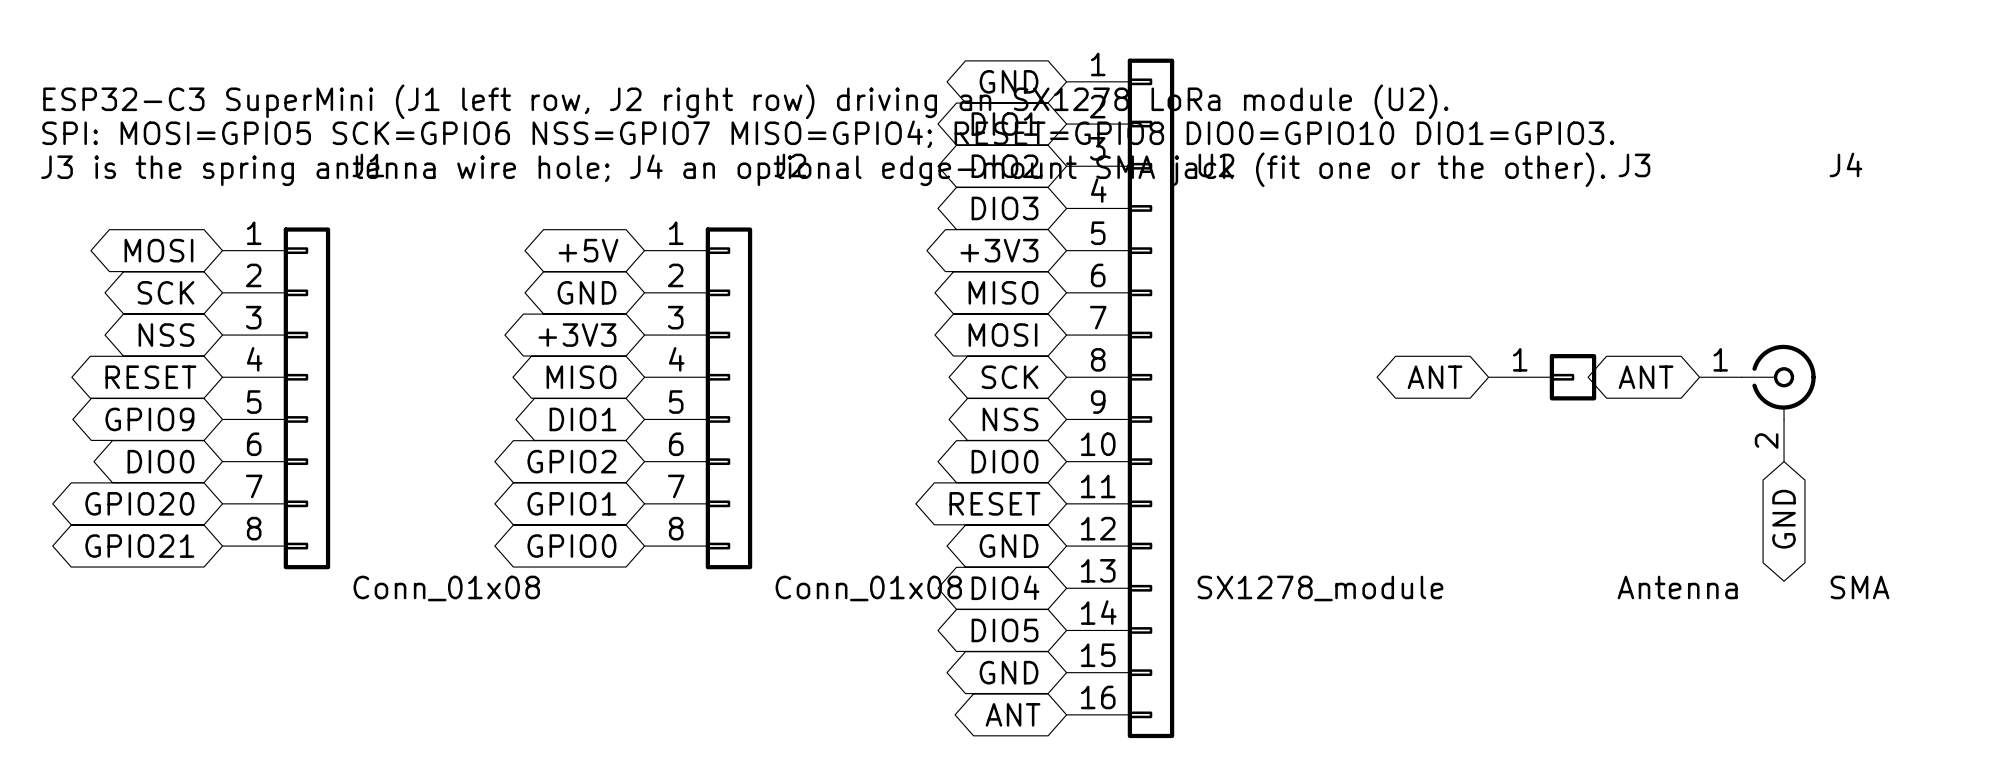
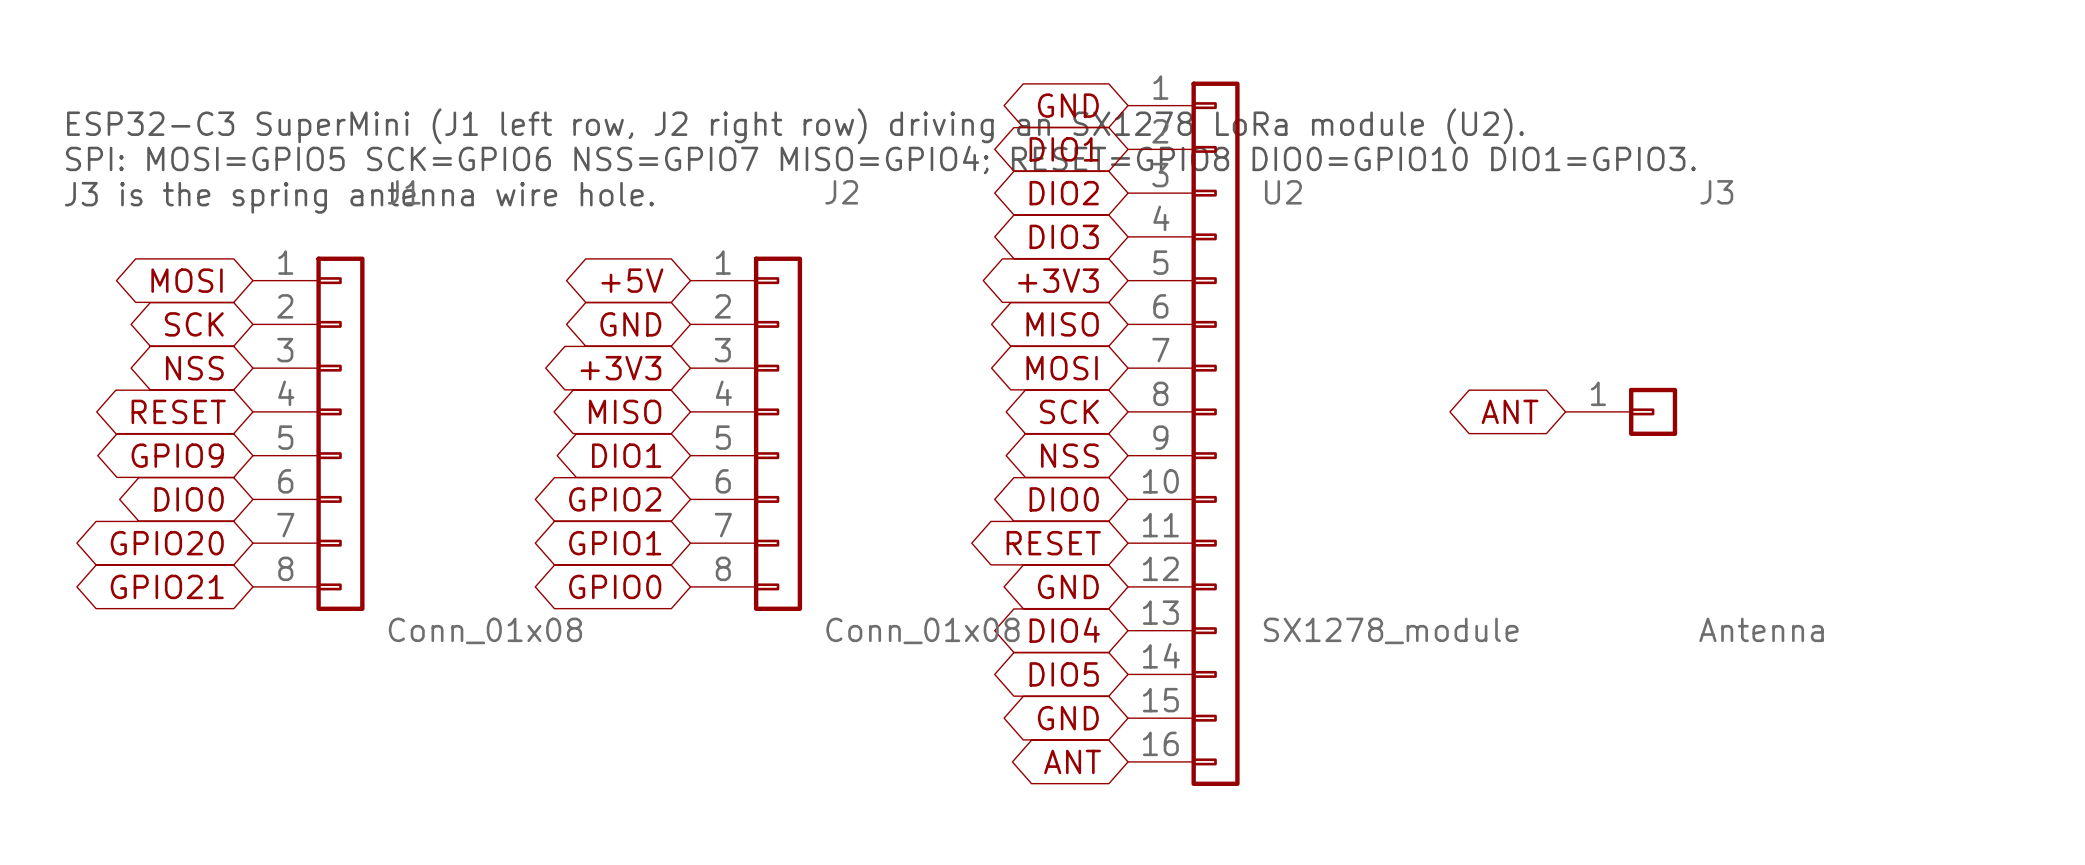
text: J3 is the spring antenna wire hole; J4 an optional edge-mount SMA jack (fit one or the other). (823, 169) -> J3 is the spring antenna wire hole. (359, 197)
global label: ANT (1646, 377) -> none
J4: SMA (1757, 403) -> none
global label: GND (1784, 519) -> none

